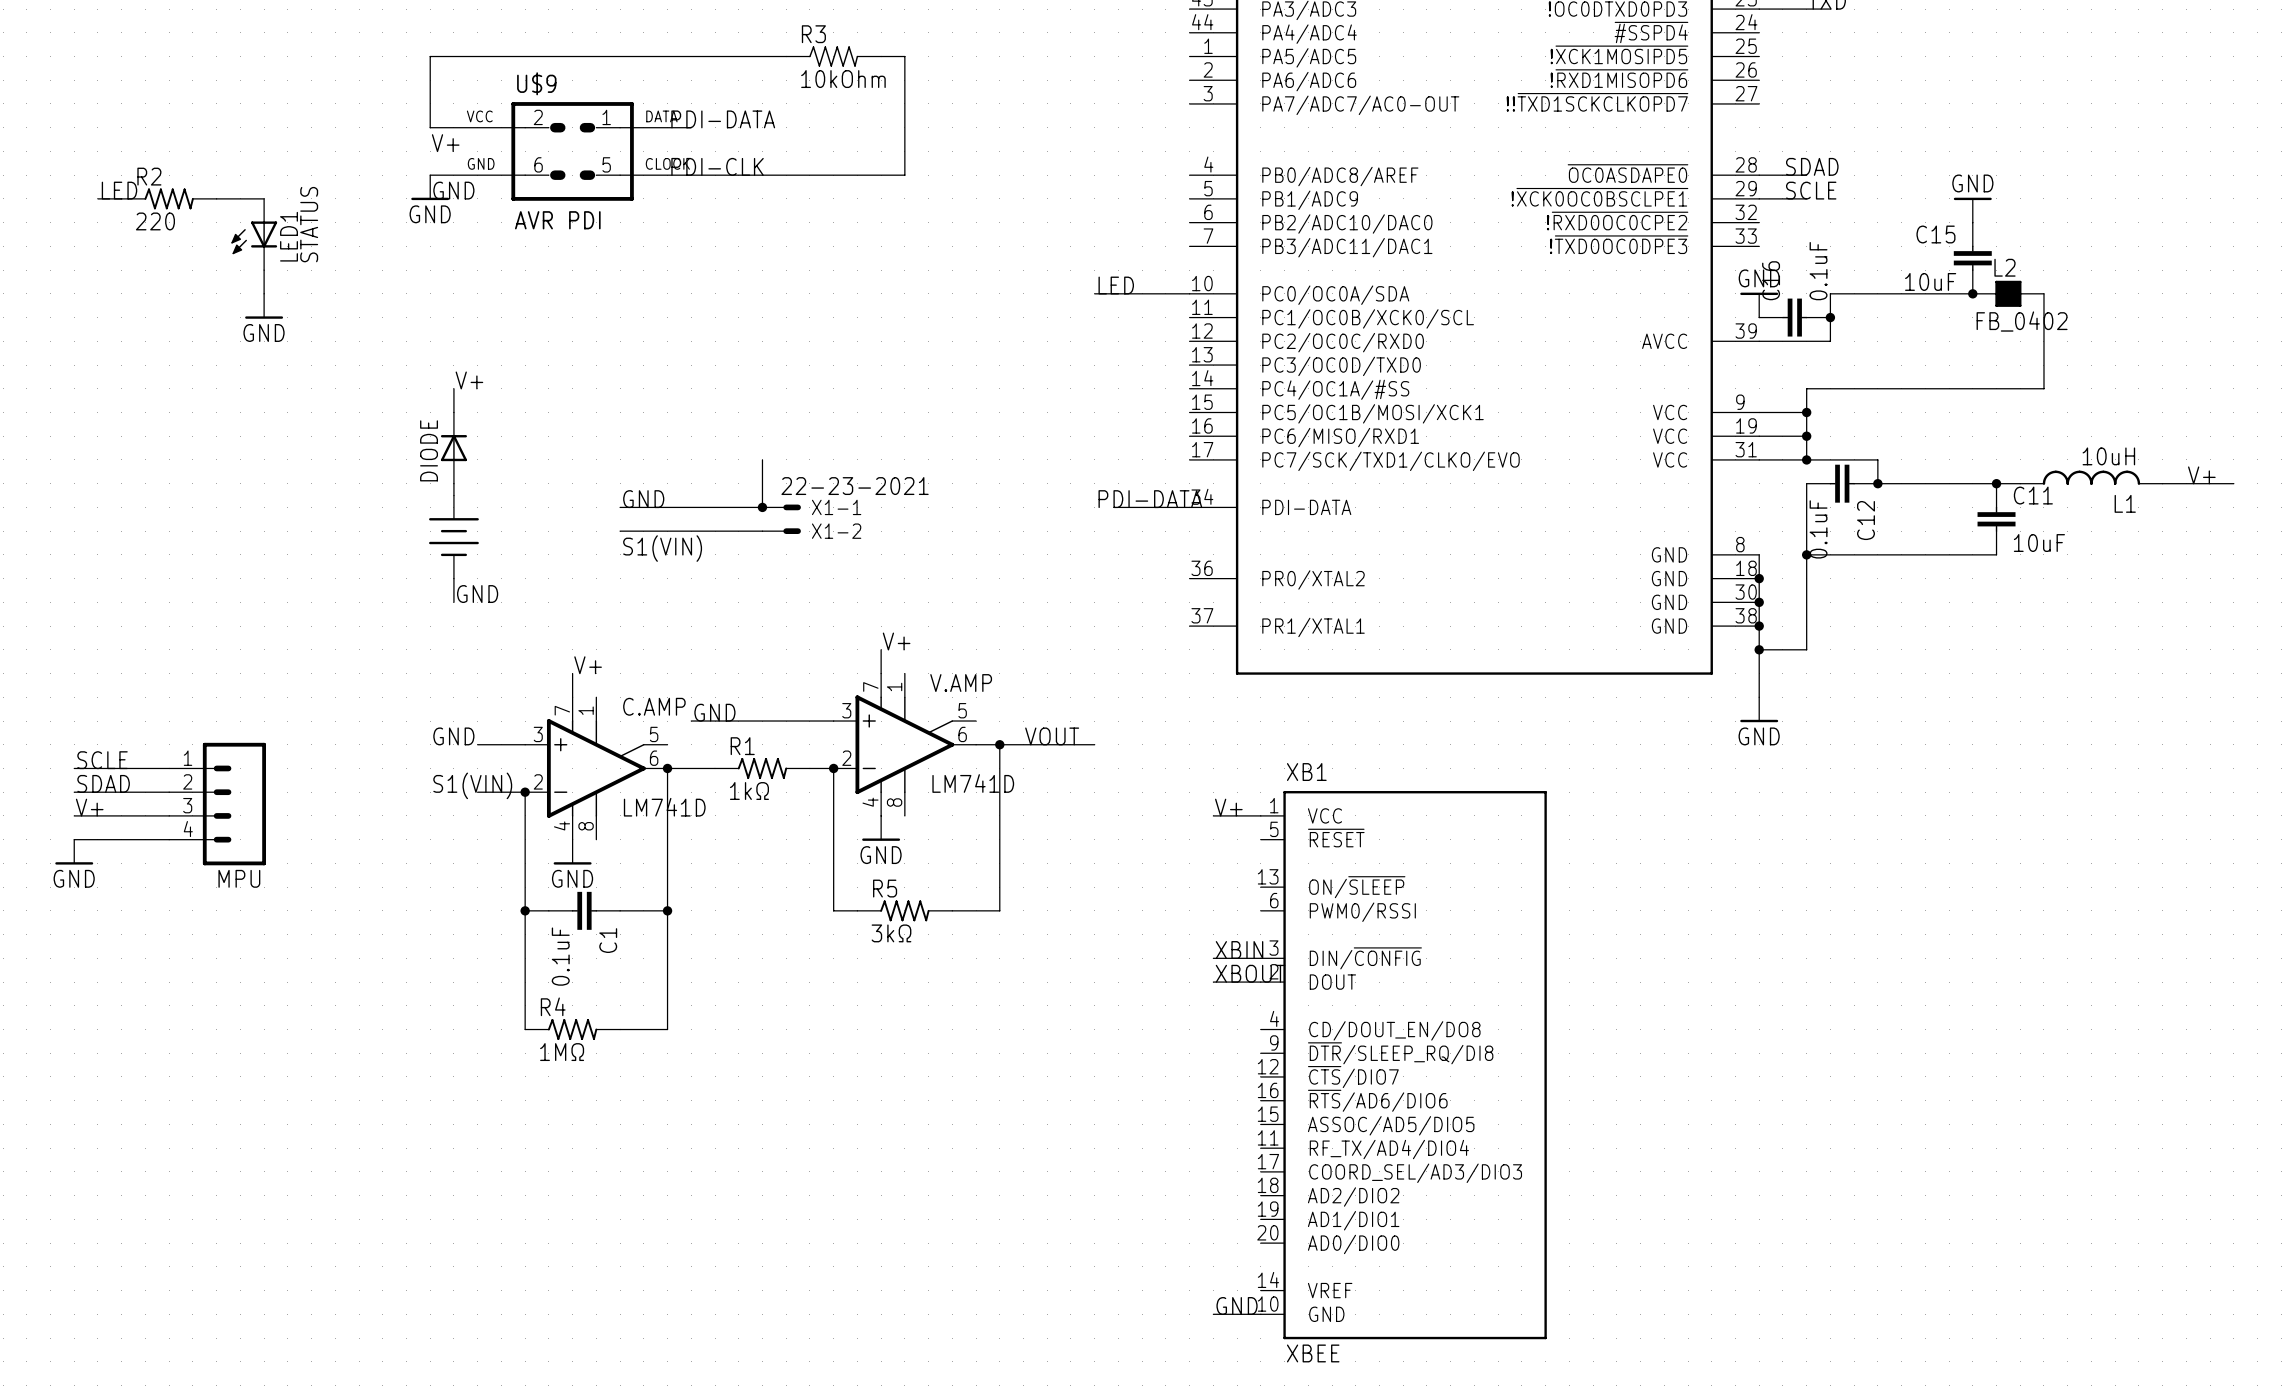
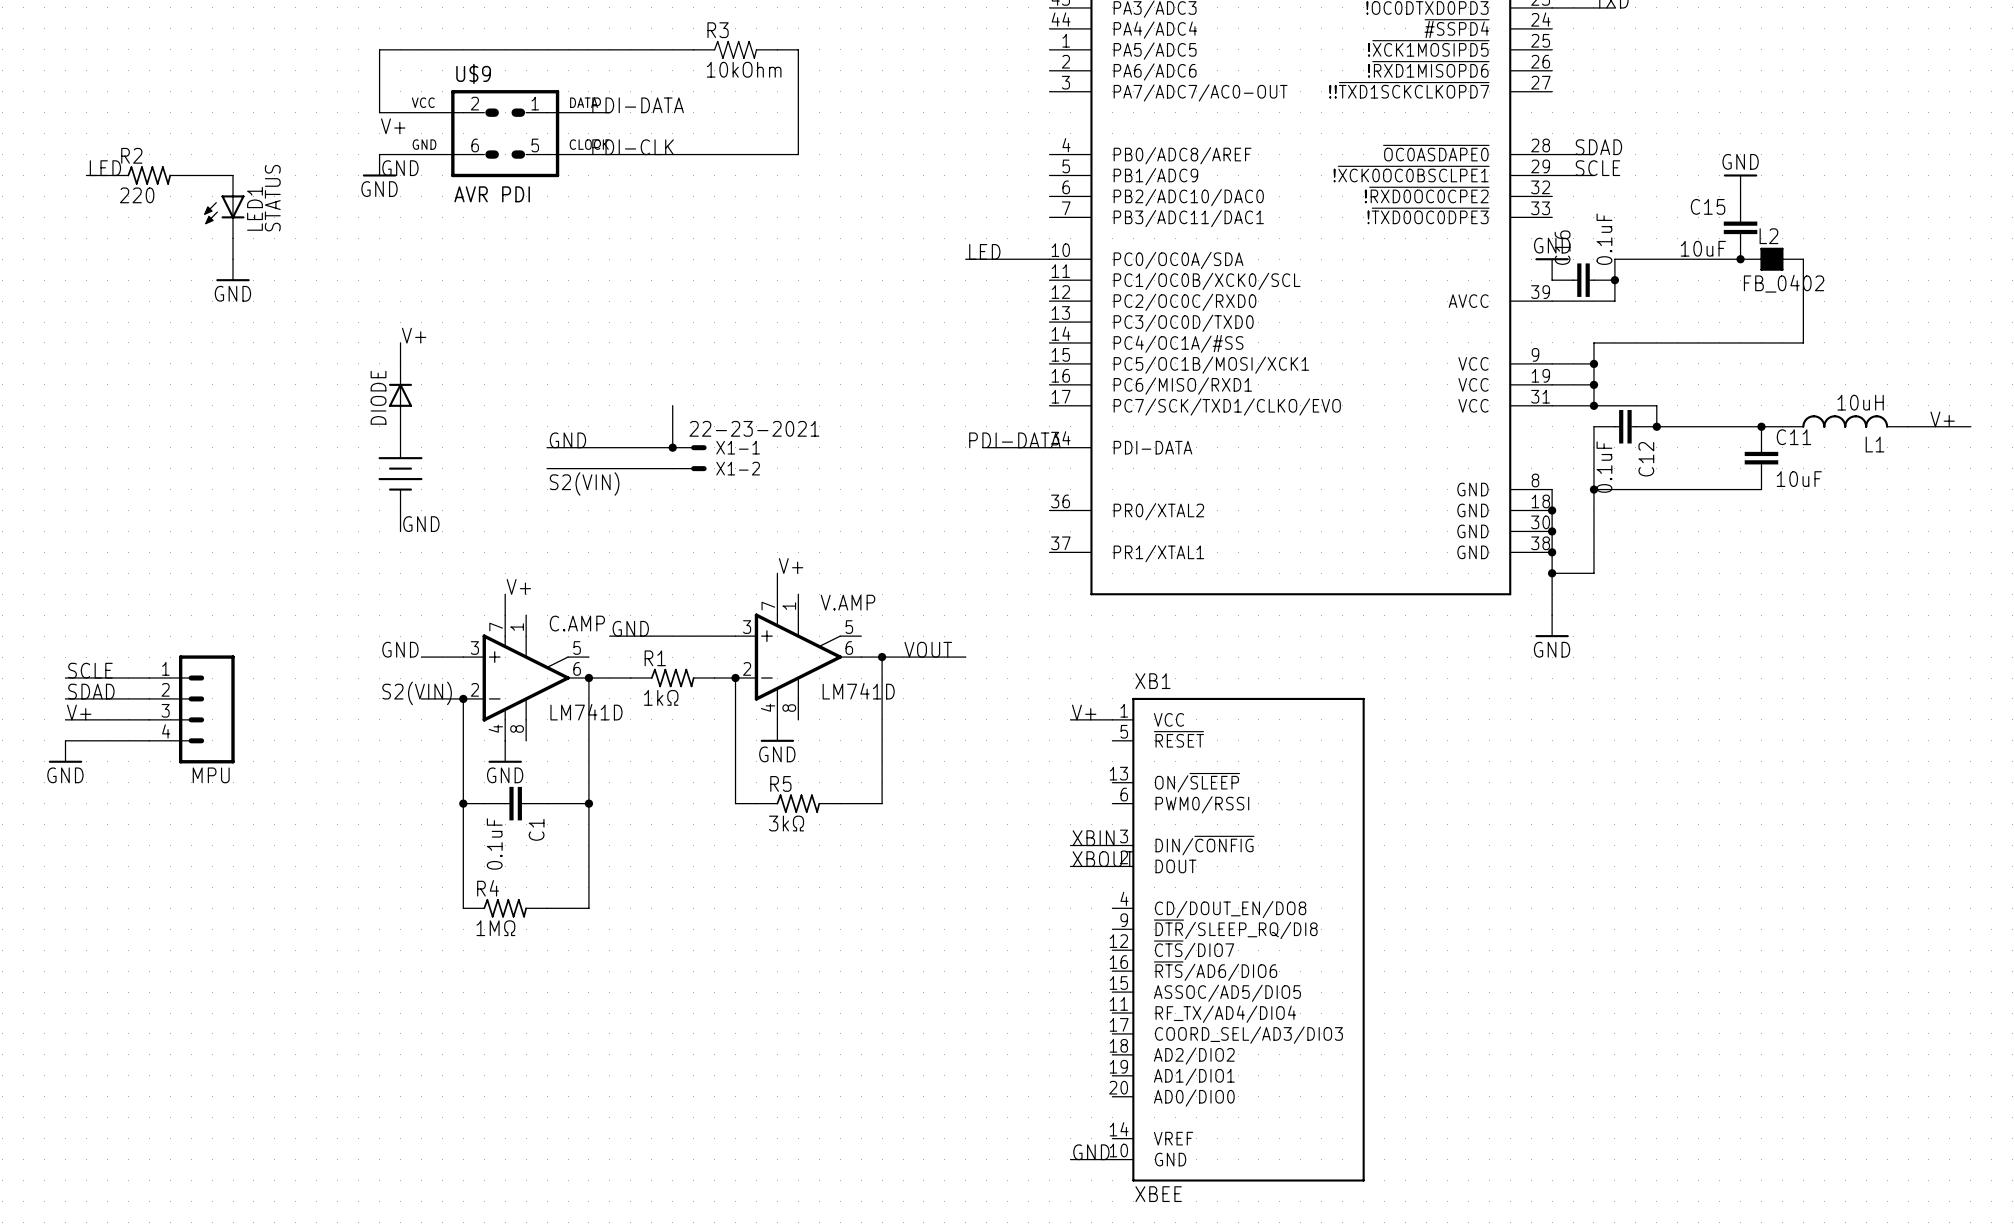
label: S1(VIN) (662, 548) -> S2(VIN) (584, 483)
label: S1(VIN) (472, 785) -> S2(VIN) (417, 693)

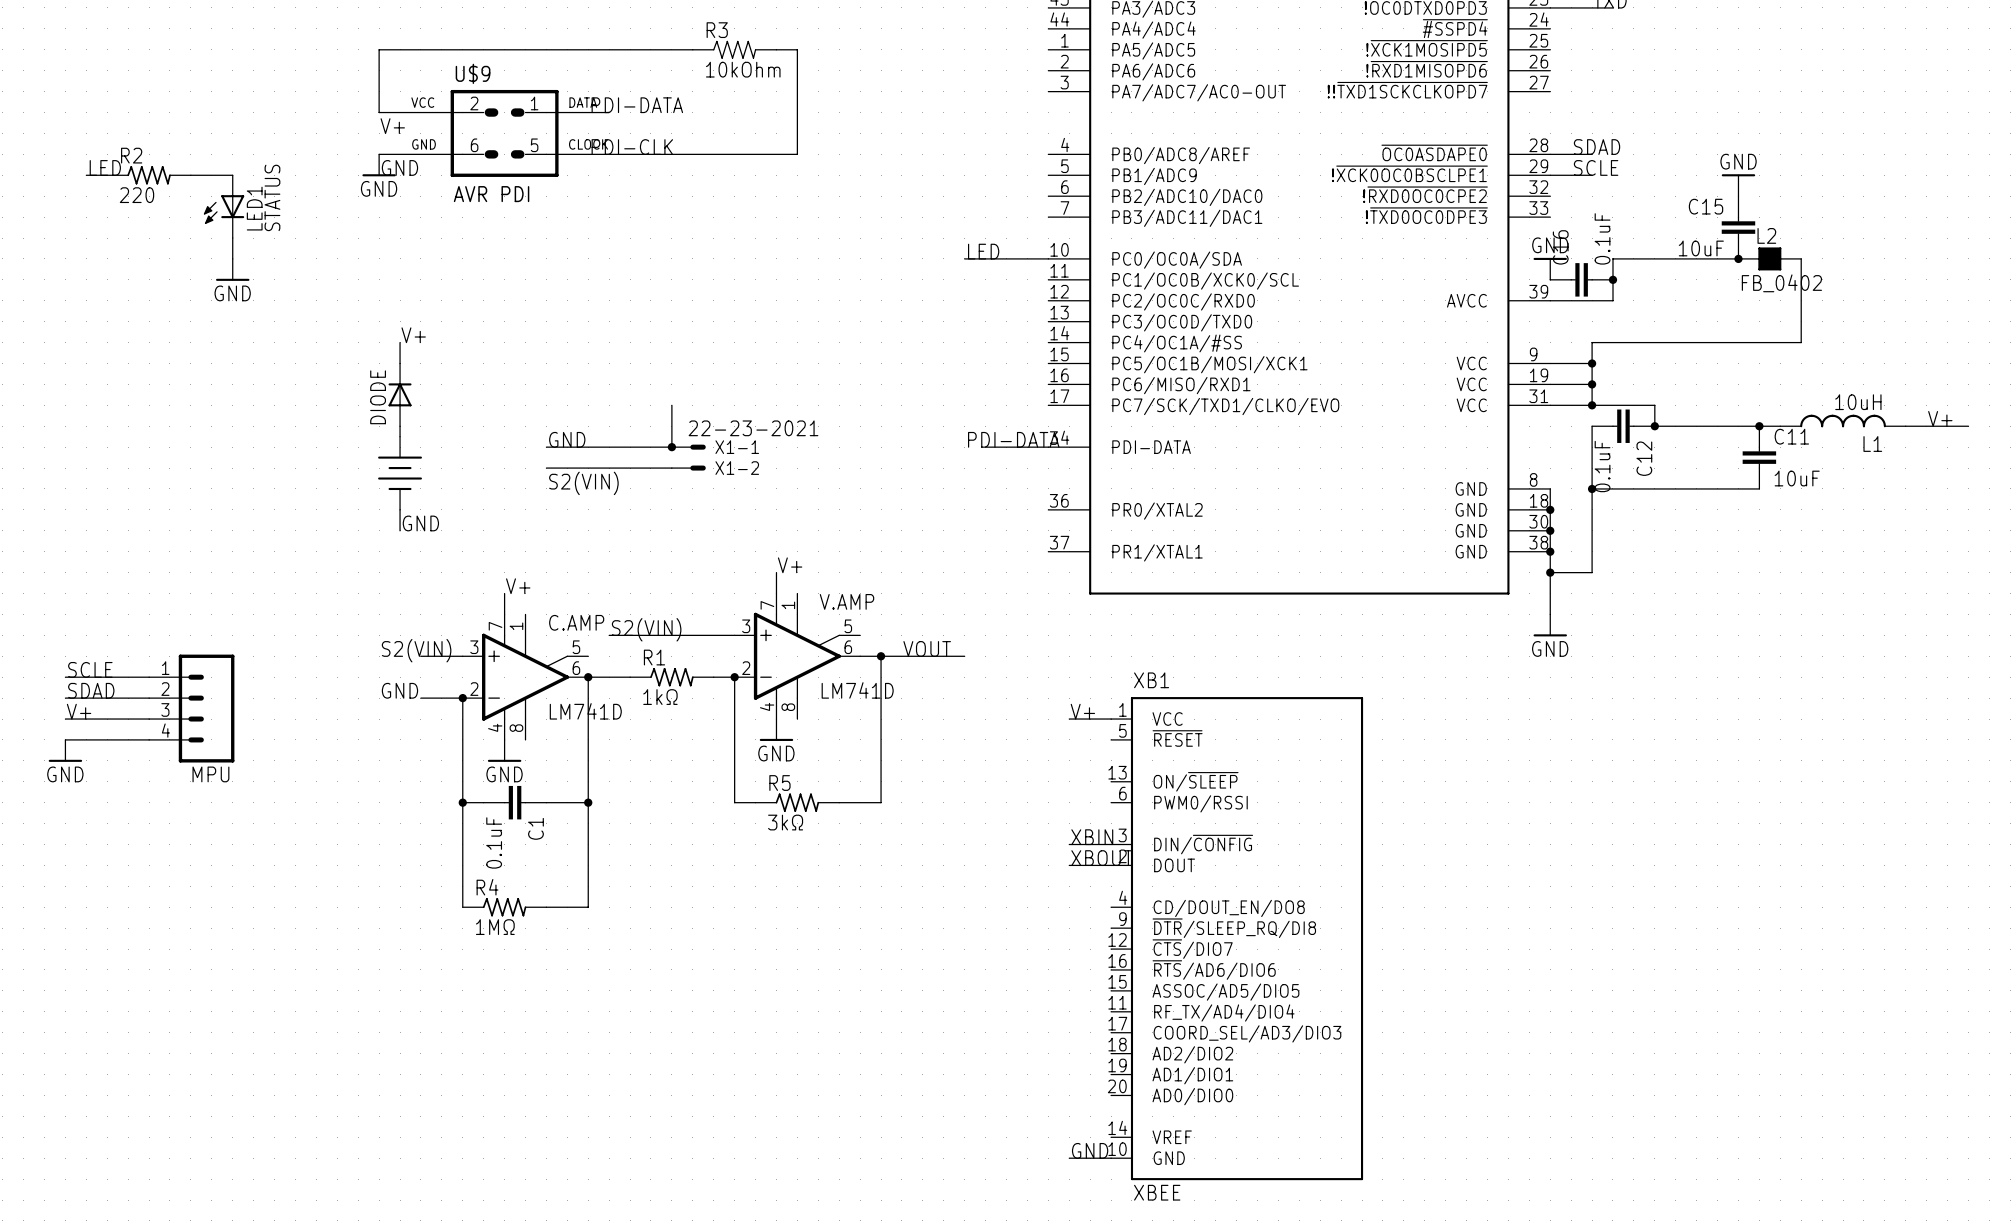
label: GND (630, 628) -> S2(VIN) (646, 629)
label: GND (400, 649) -> S2(VIN) (416, 650)
label: S2(VIN) (417, 693) -> GND (399, 690)

